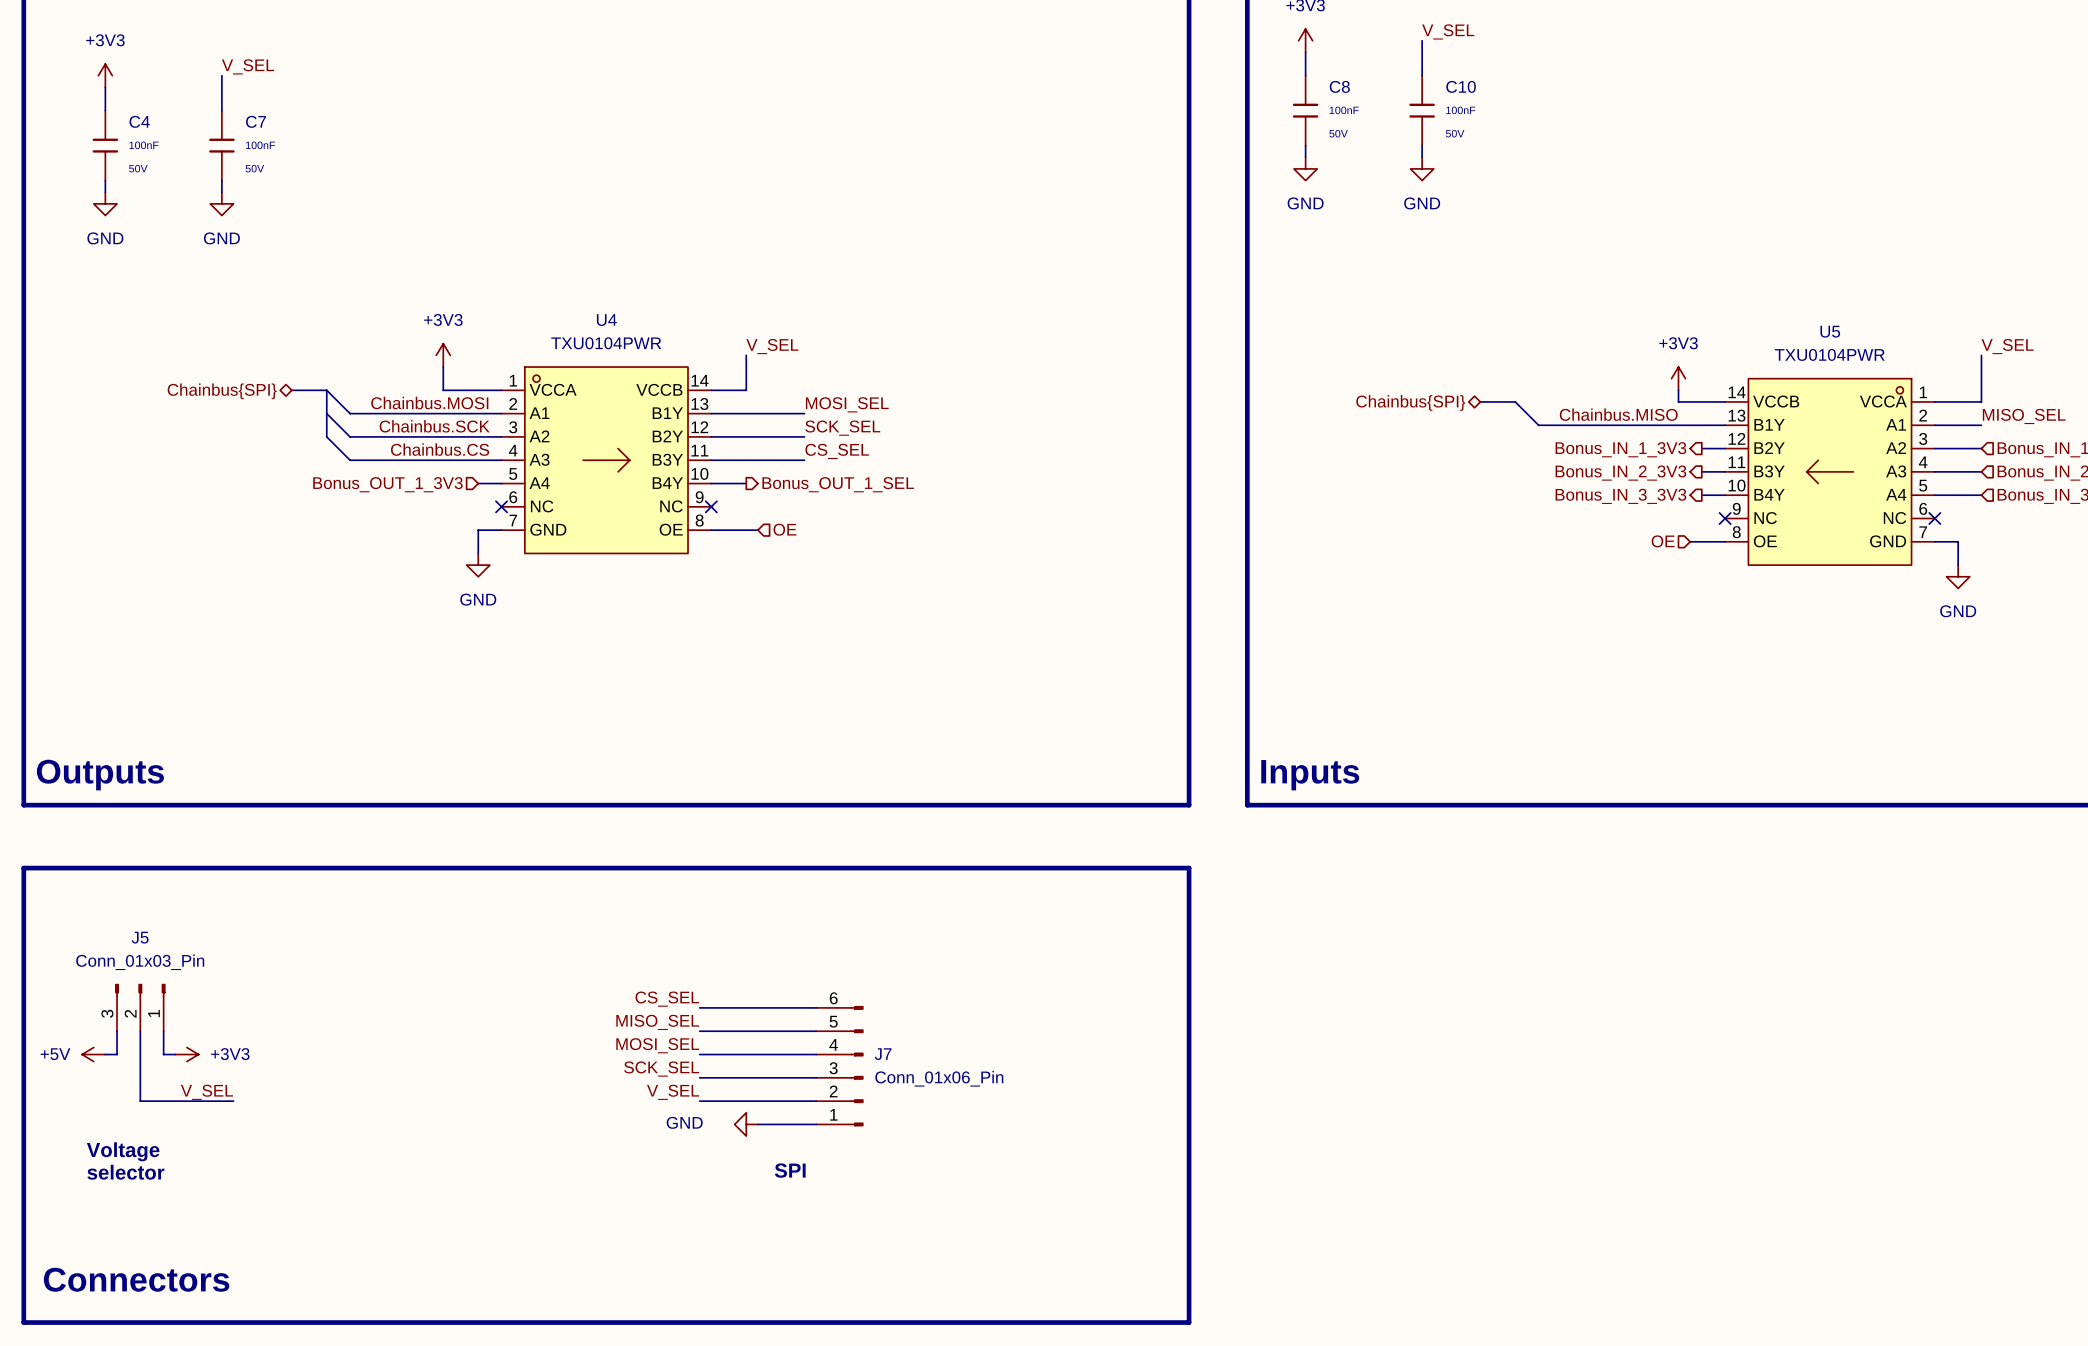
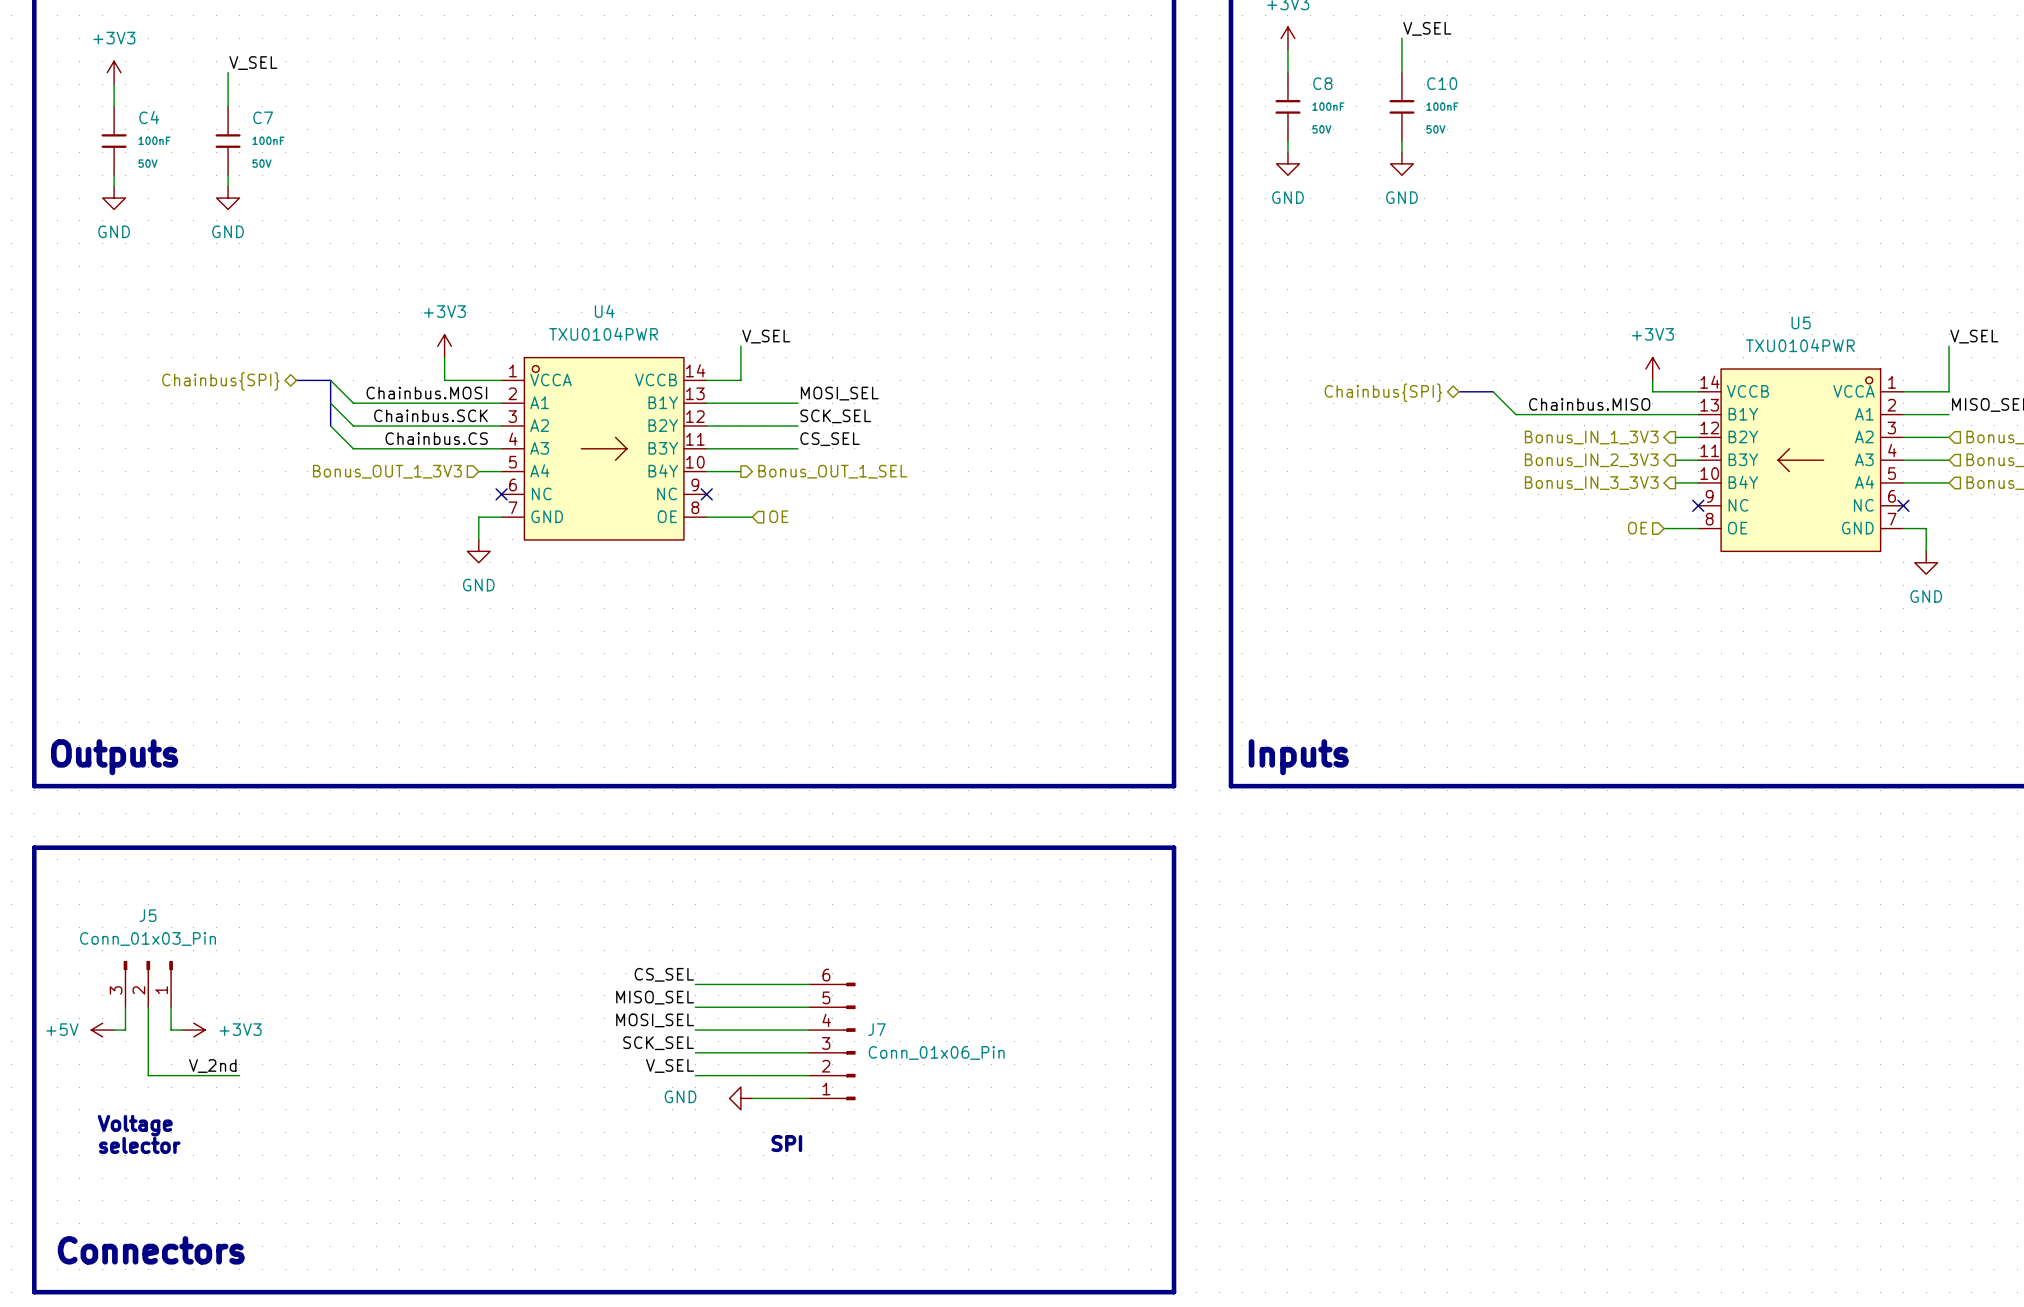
label: V_SEL (206, 1092) -> V_2nd (212, 1066)

